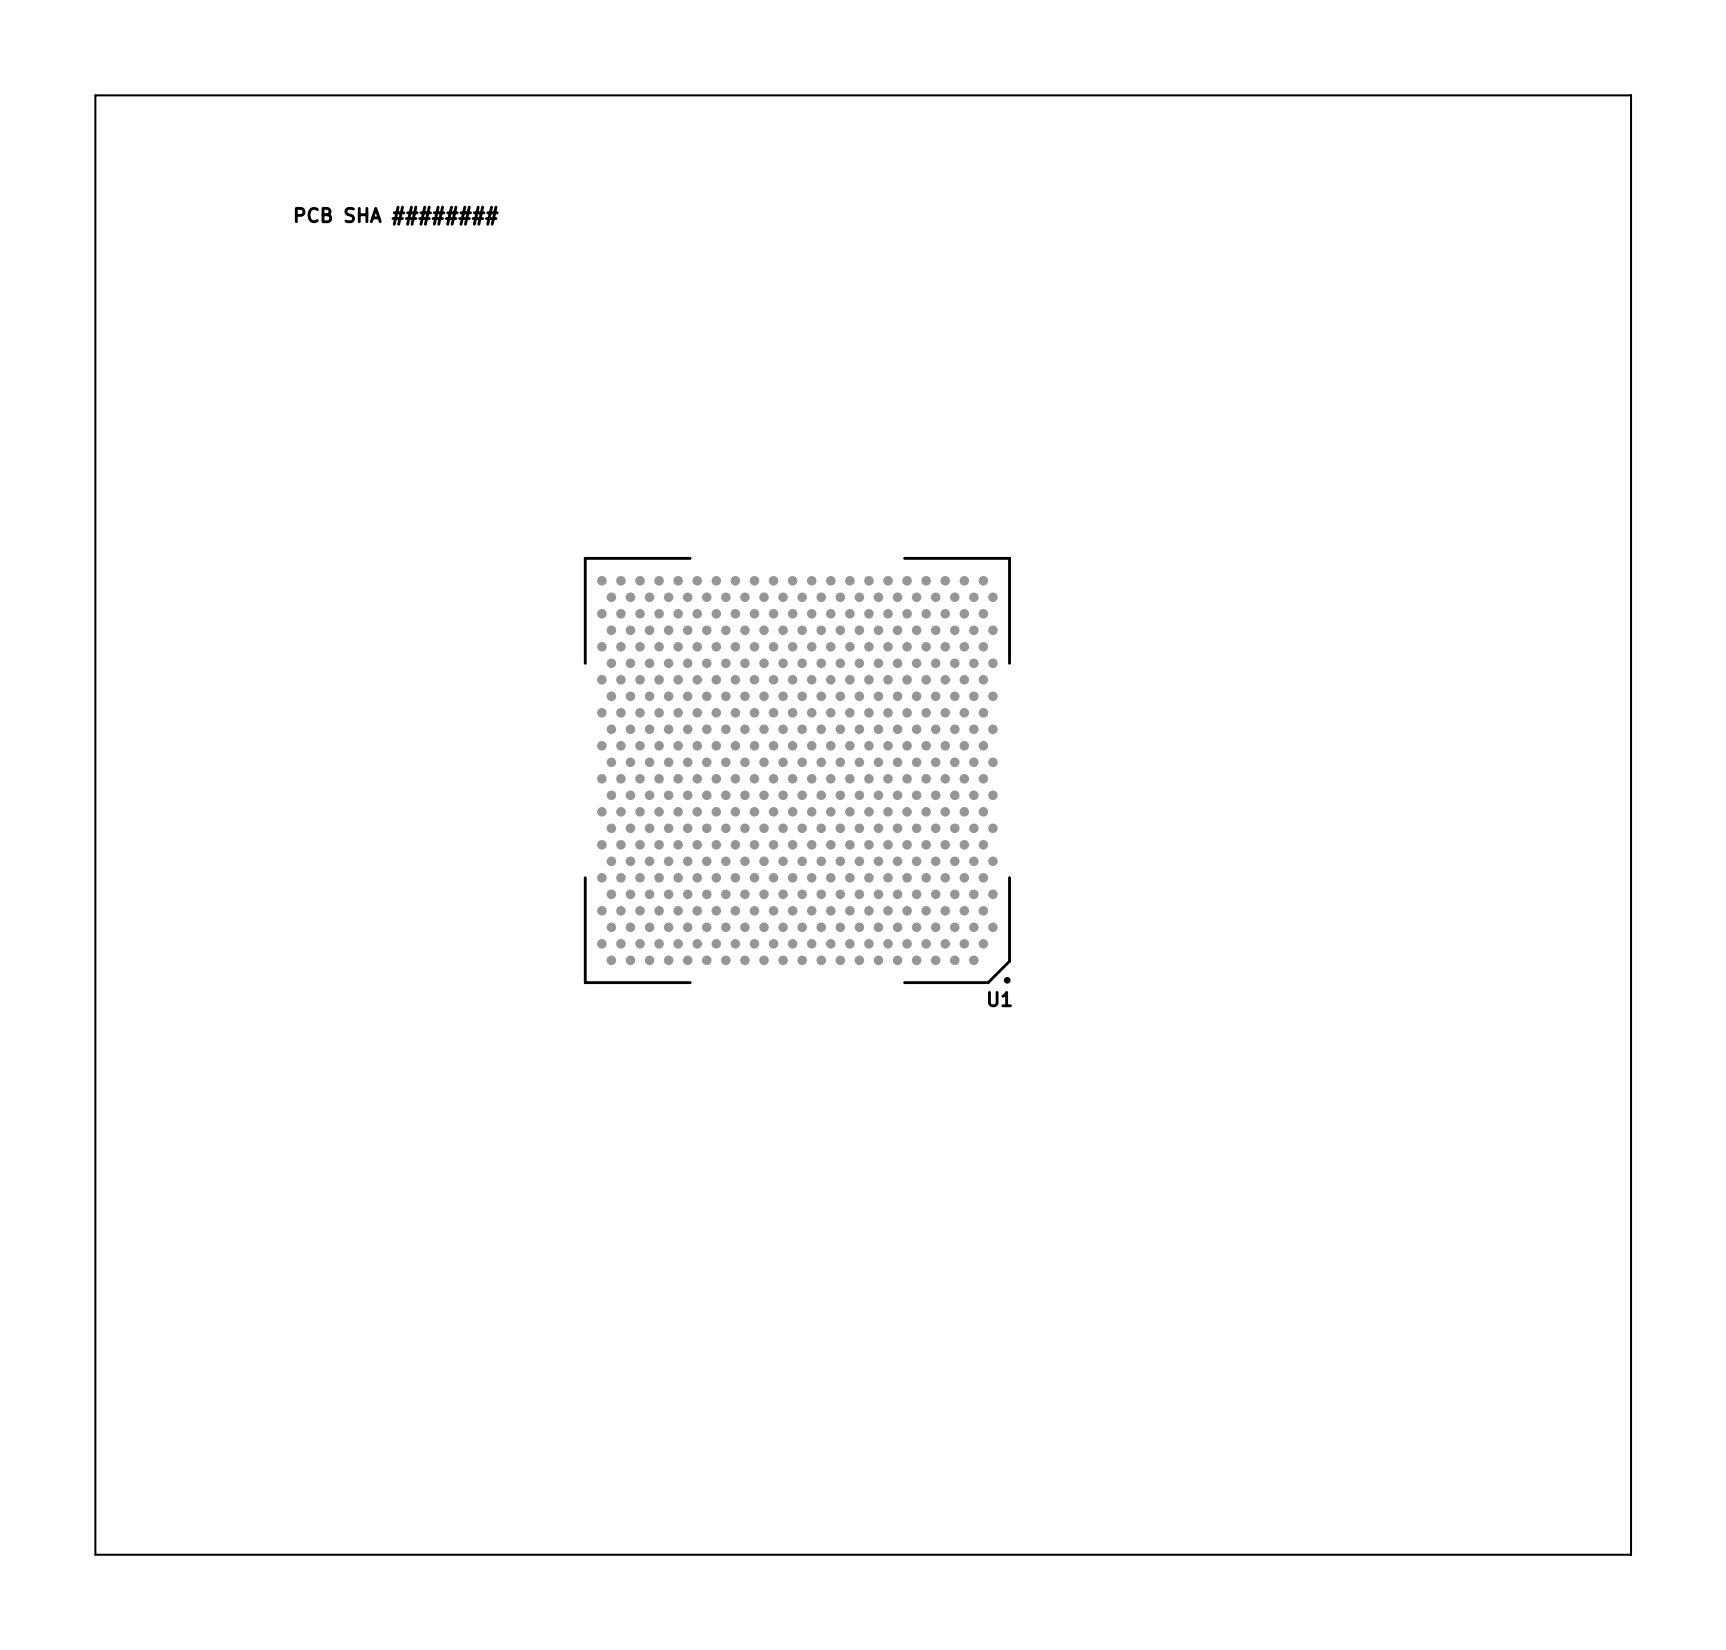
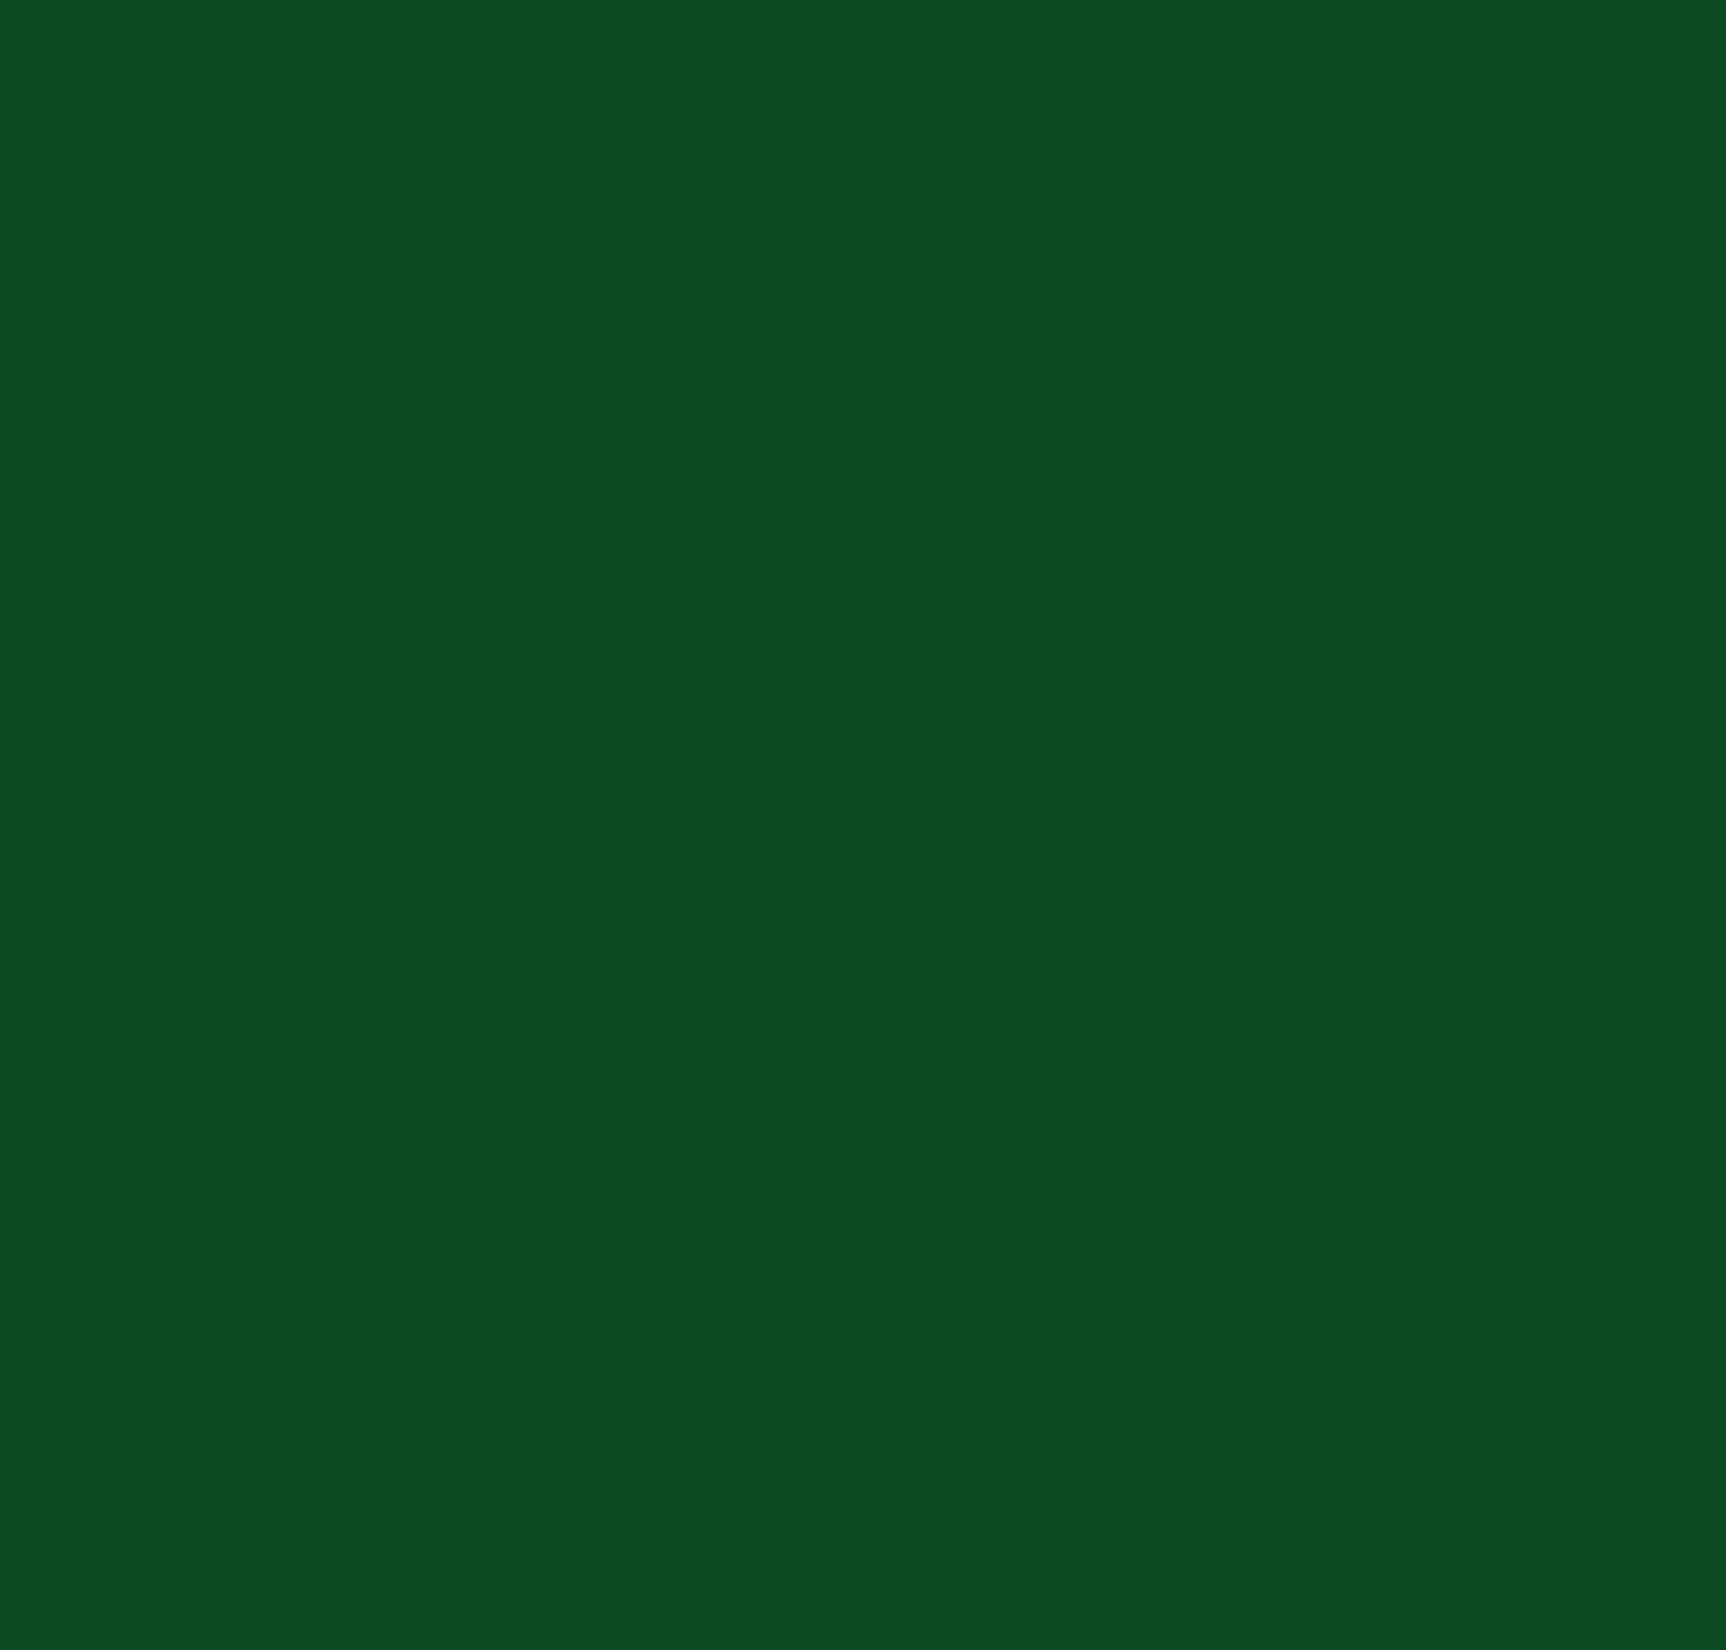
board edge: (95, 95) (1631, 95) (1631, 1554) (95, 1554) (95, 95) -> none
text: PCB SHA ######## (396, 215) -> none
U1: (797, 770) -> none

